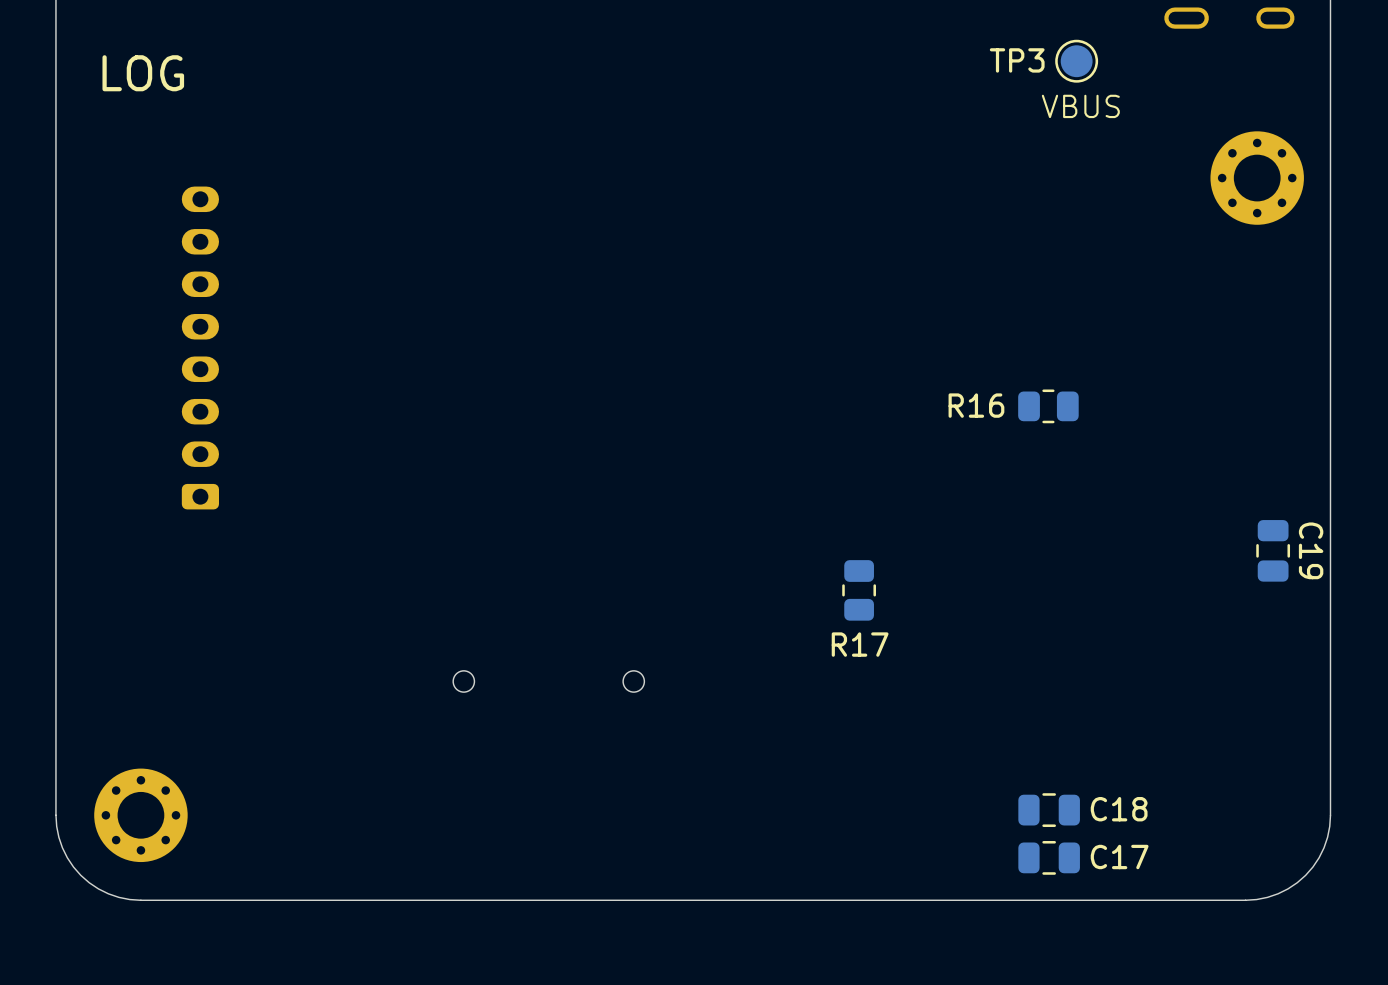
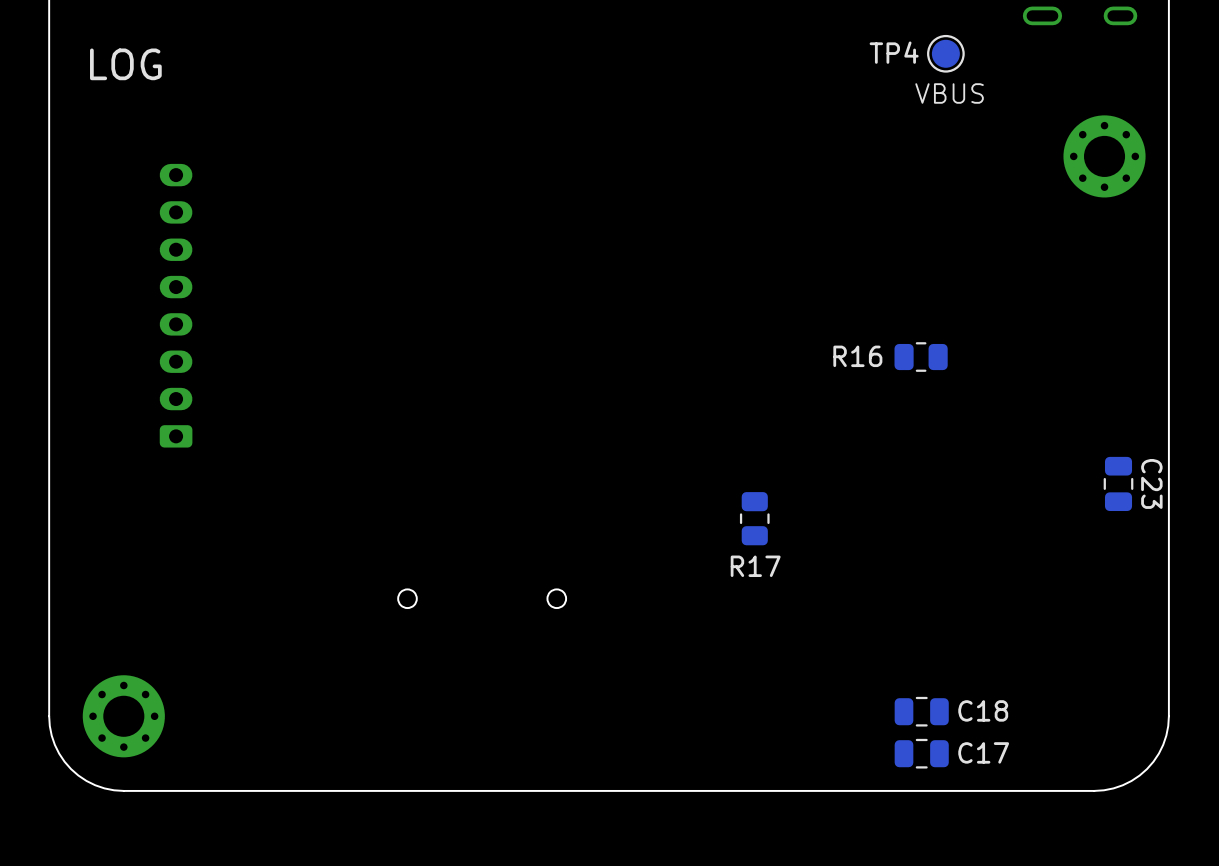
TP3 name: TP3 (1017, 60) -> TP4 (894, 52)
C19 name: C19 (1311, 550) -> C23 (1151, 483)

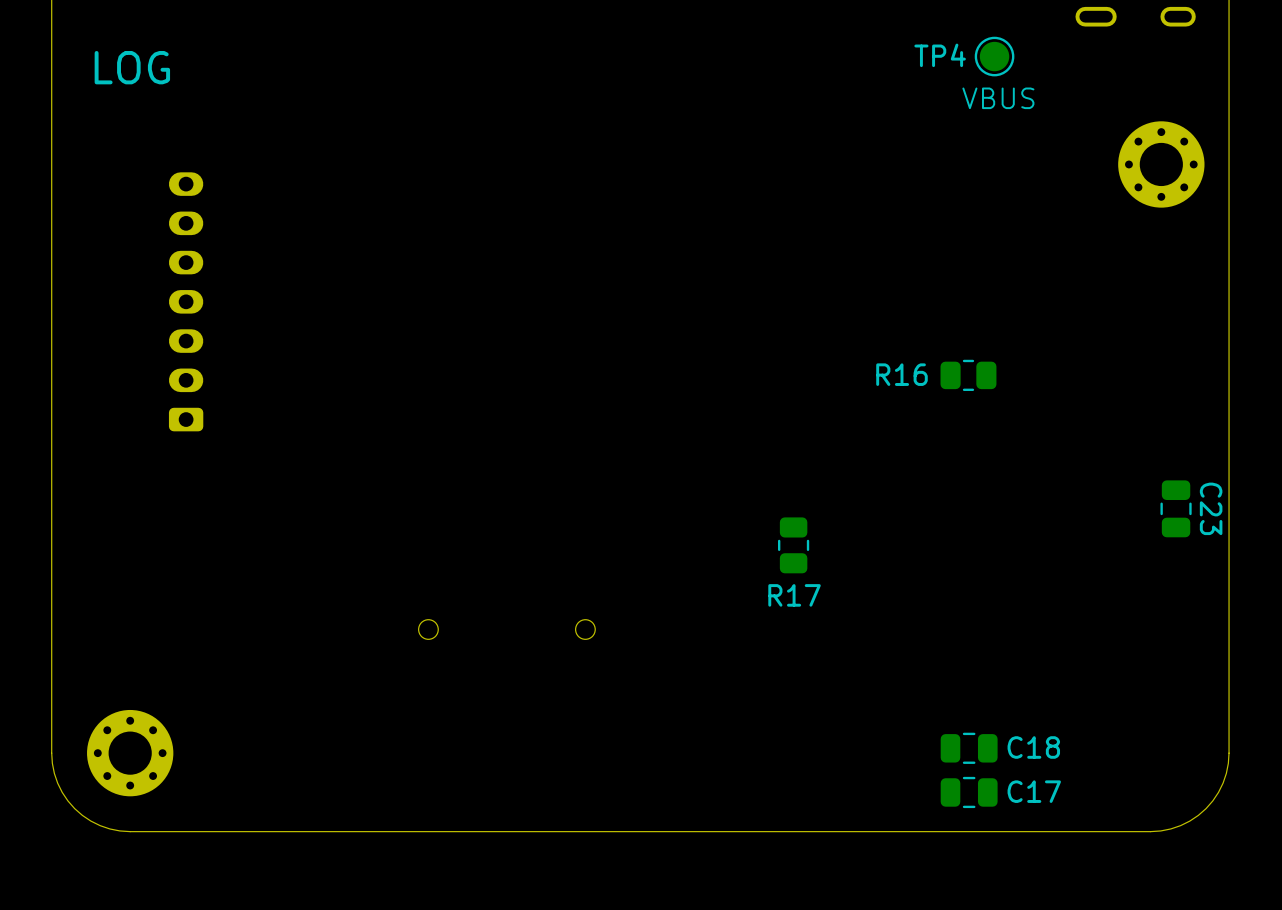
part: none -> (186, 301)
part: (176, 305) -> none

